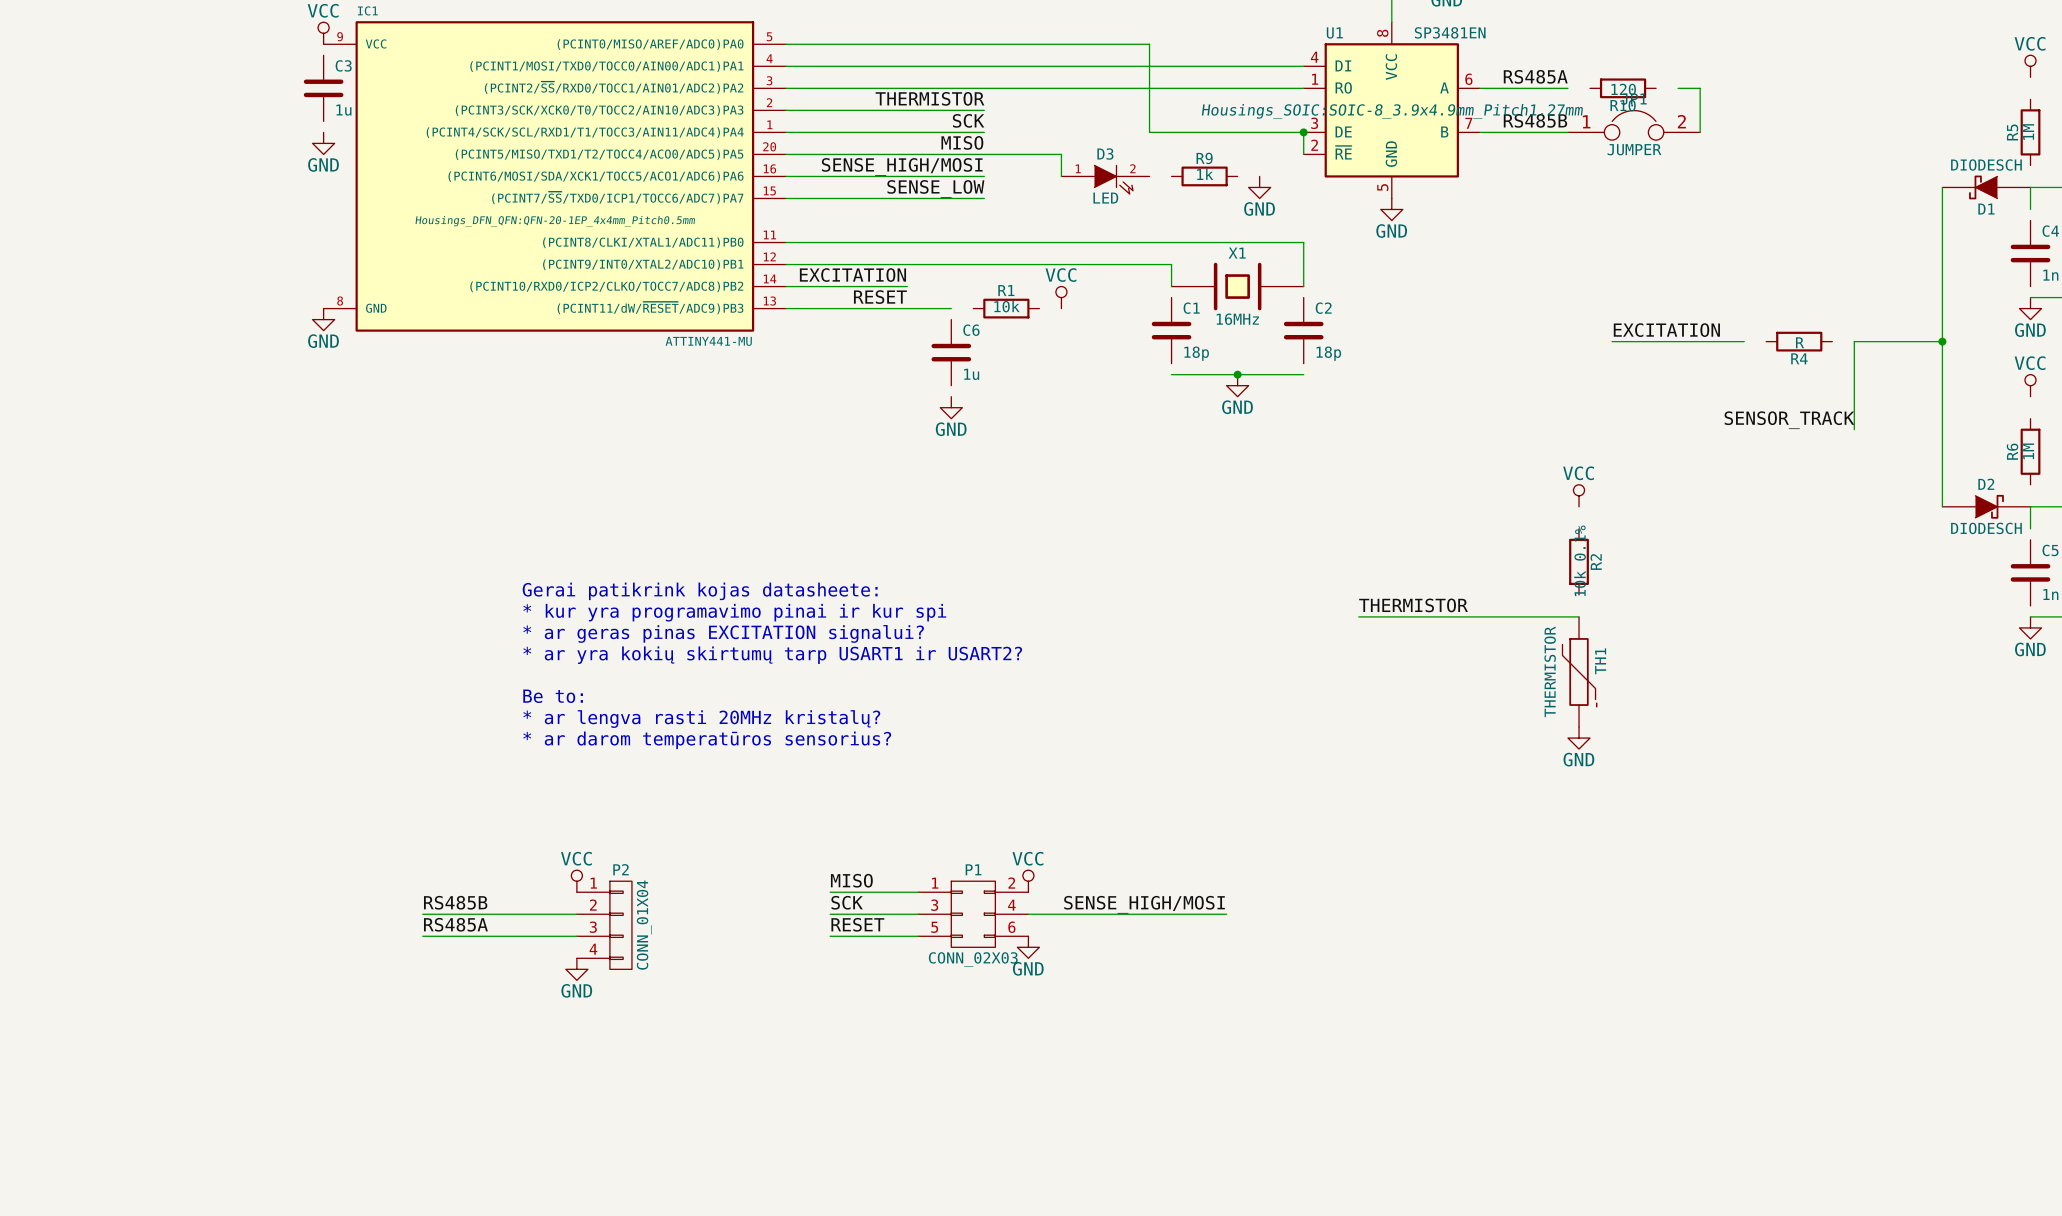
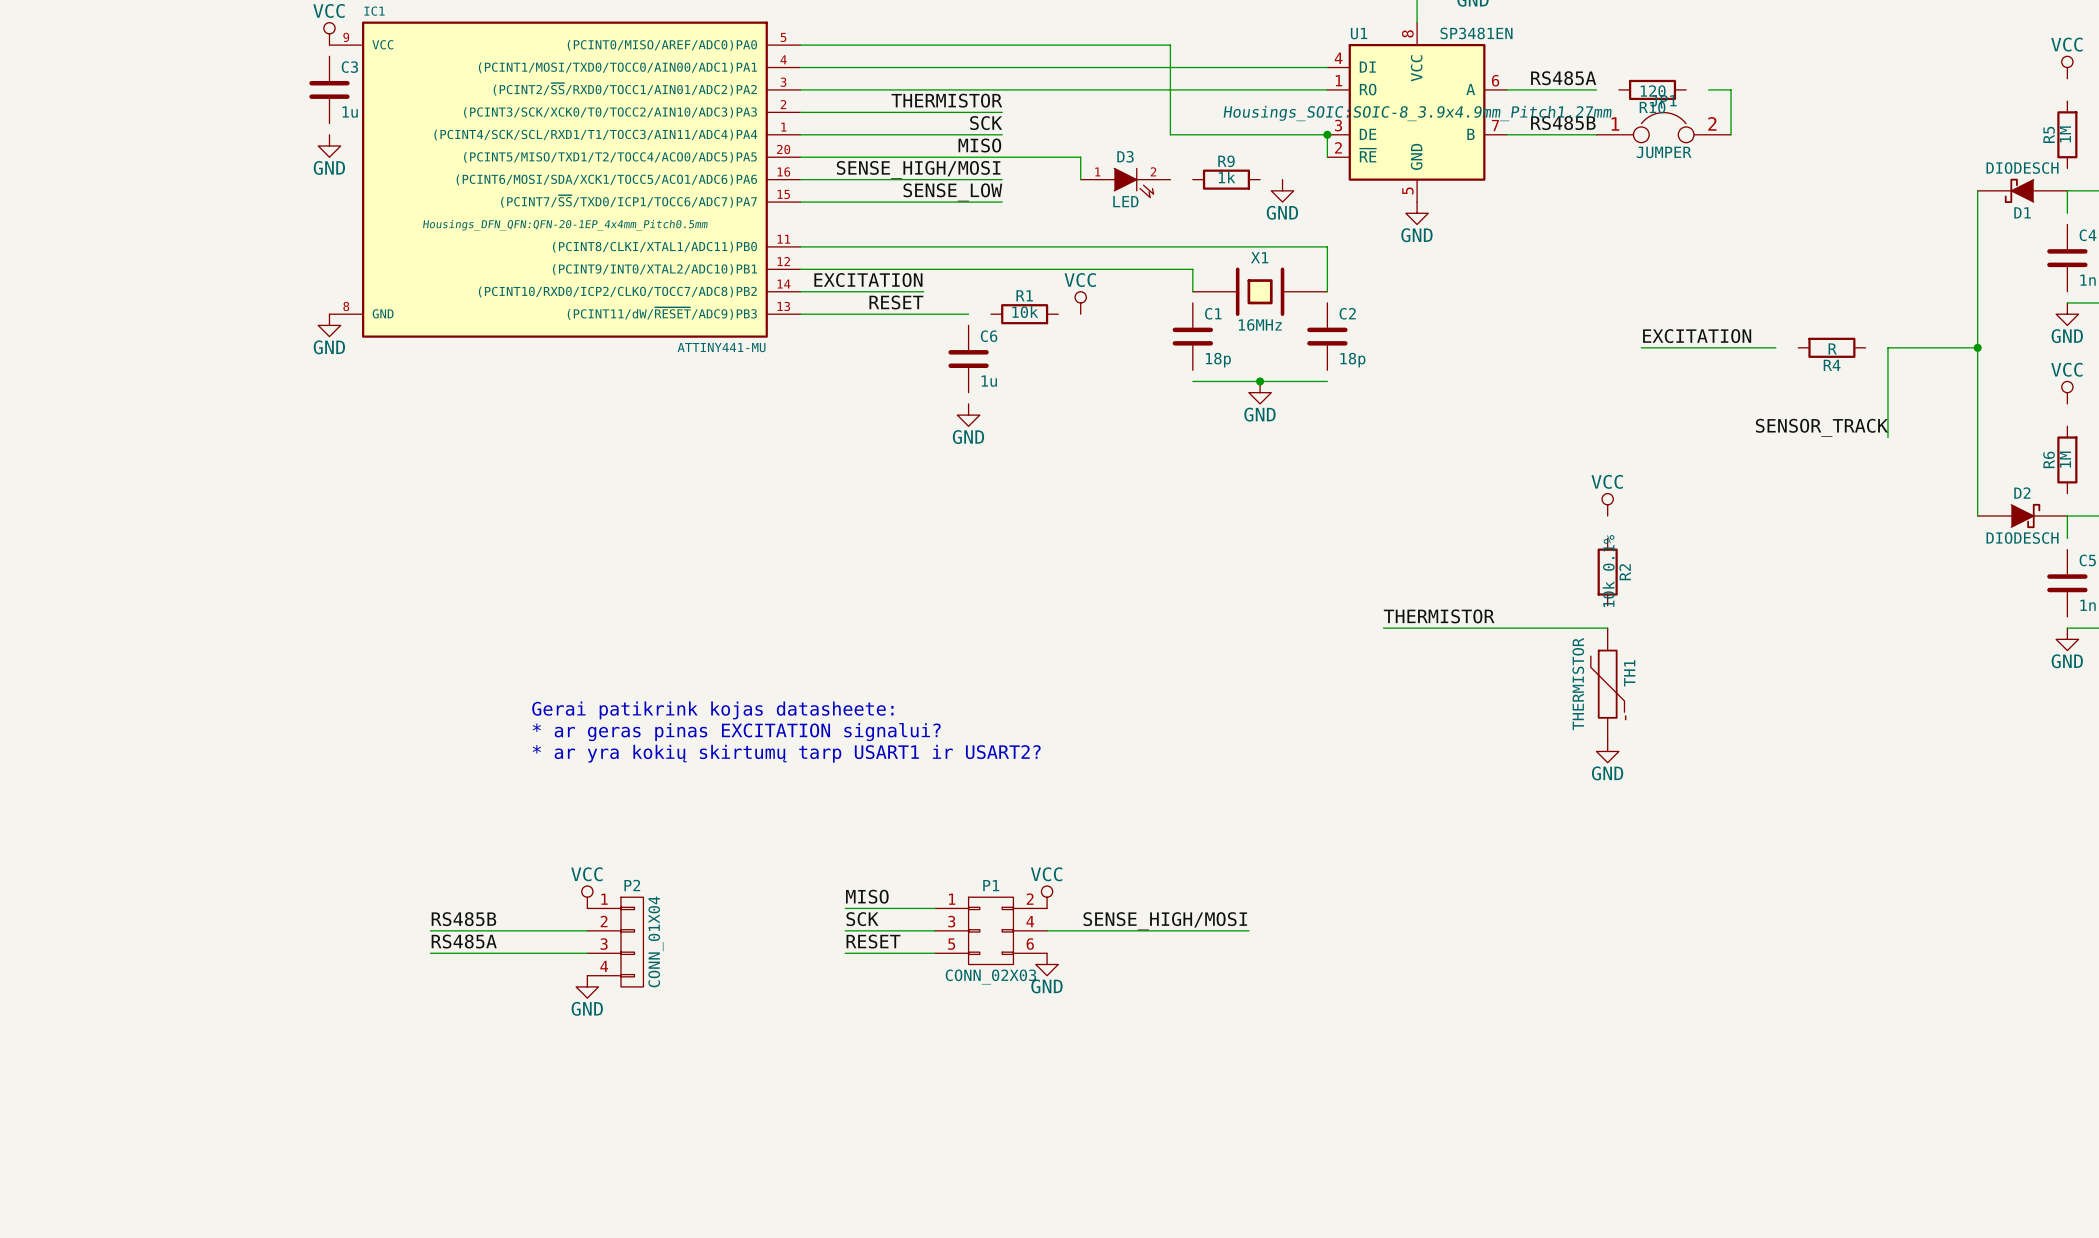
text: Gerai patikrink kojas datasheete: (700, 591) -> none
text: * kur yra programavimo pinai ir kur spi (734, 612) -> none
text: * ar geras pinas EXCITATION signalui? (723, 633) -> none
text: * ar yra kokių skirtumų tarp USART1 ir USART2? (772, 655) -> none
text: Be to: (553, 696) -> Gerai patikrink kojas datasheete: (712, 710)
text: * ar lengva rasti 20MHz kristalų? (701, 719) -> * ar geras pinas EXCITATION signalui? (736, 732)
text: * ar darom temperatūros sensorius? (707, 740) -> * ar yra kokių skirtumų tarp USART1 ir USART2? (786, 753)

